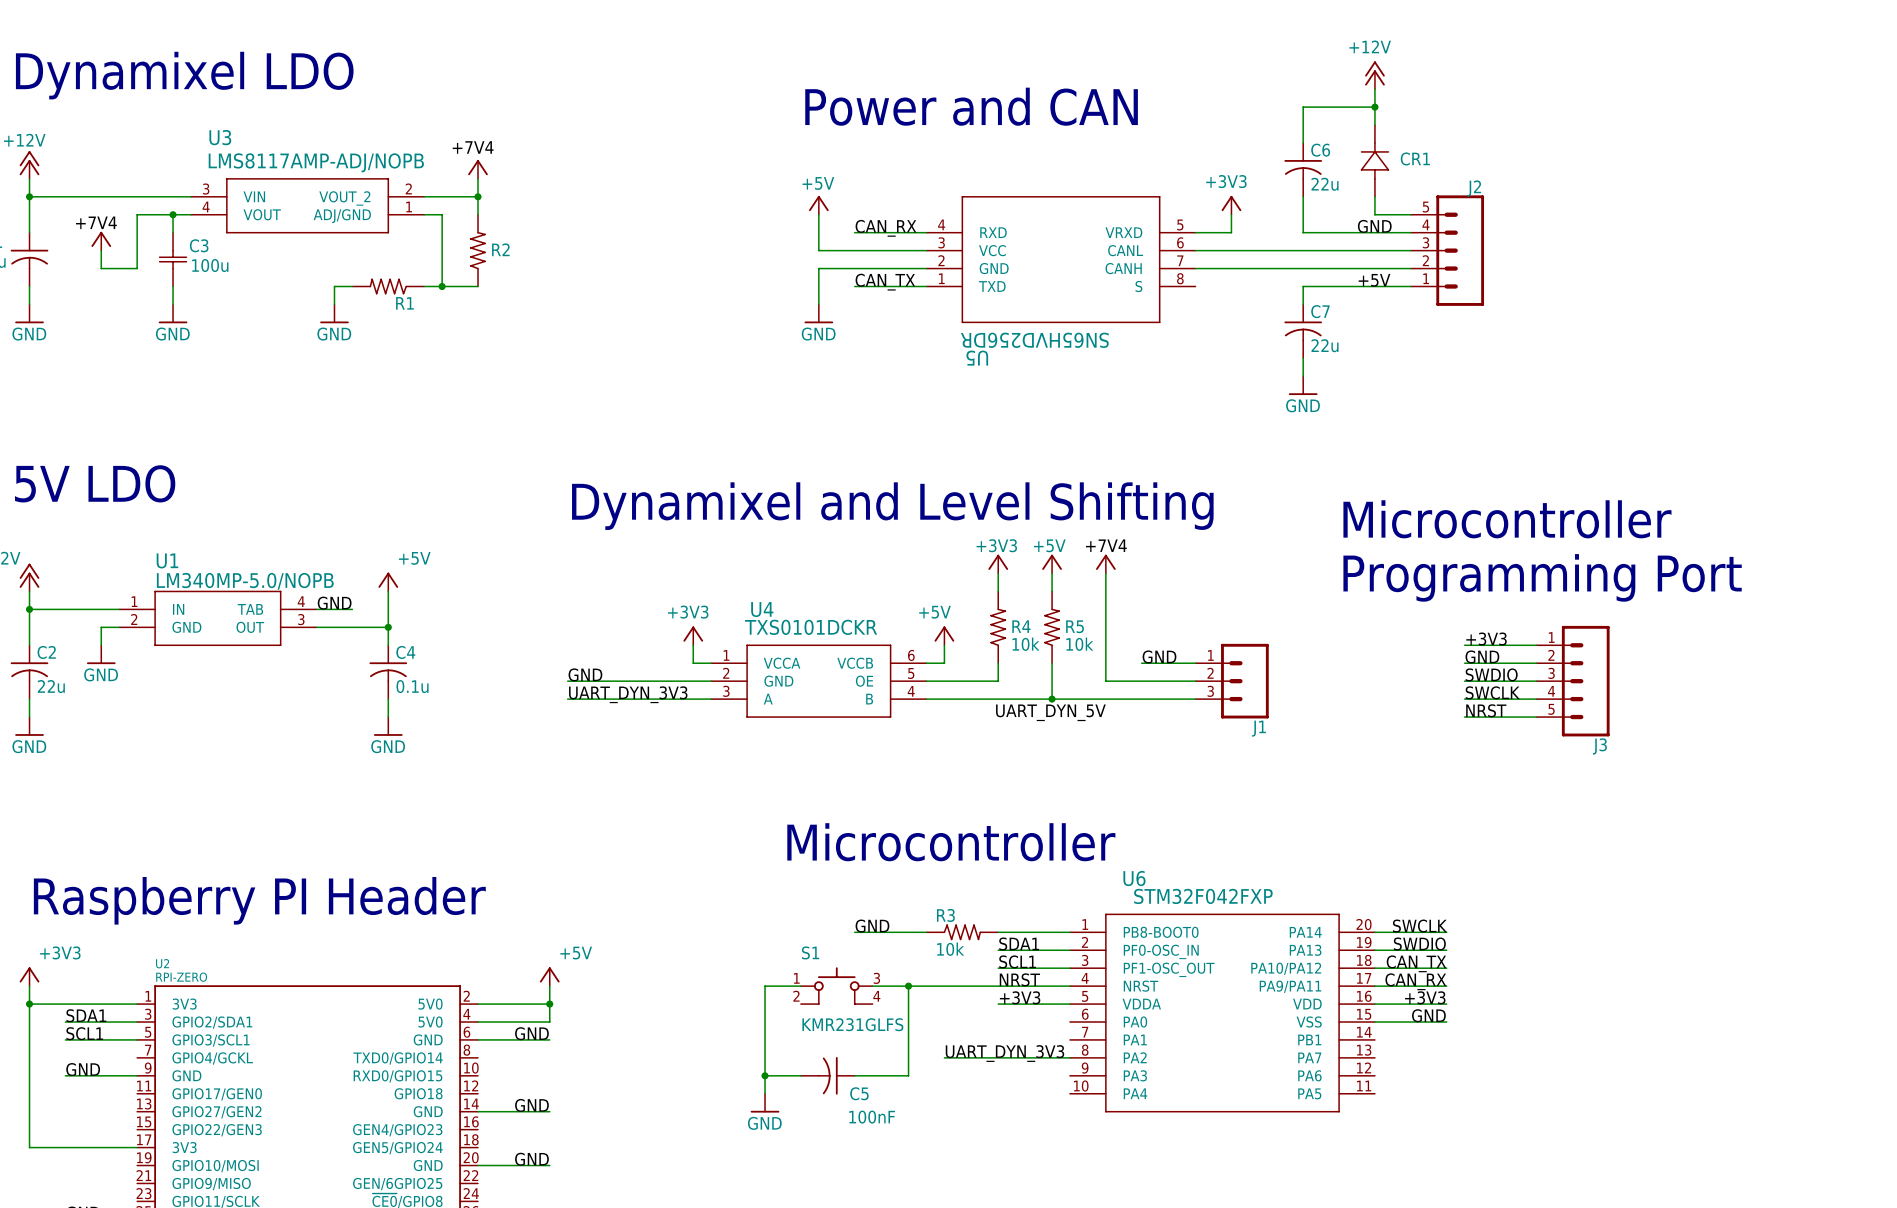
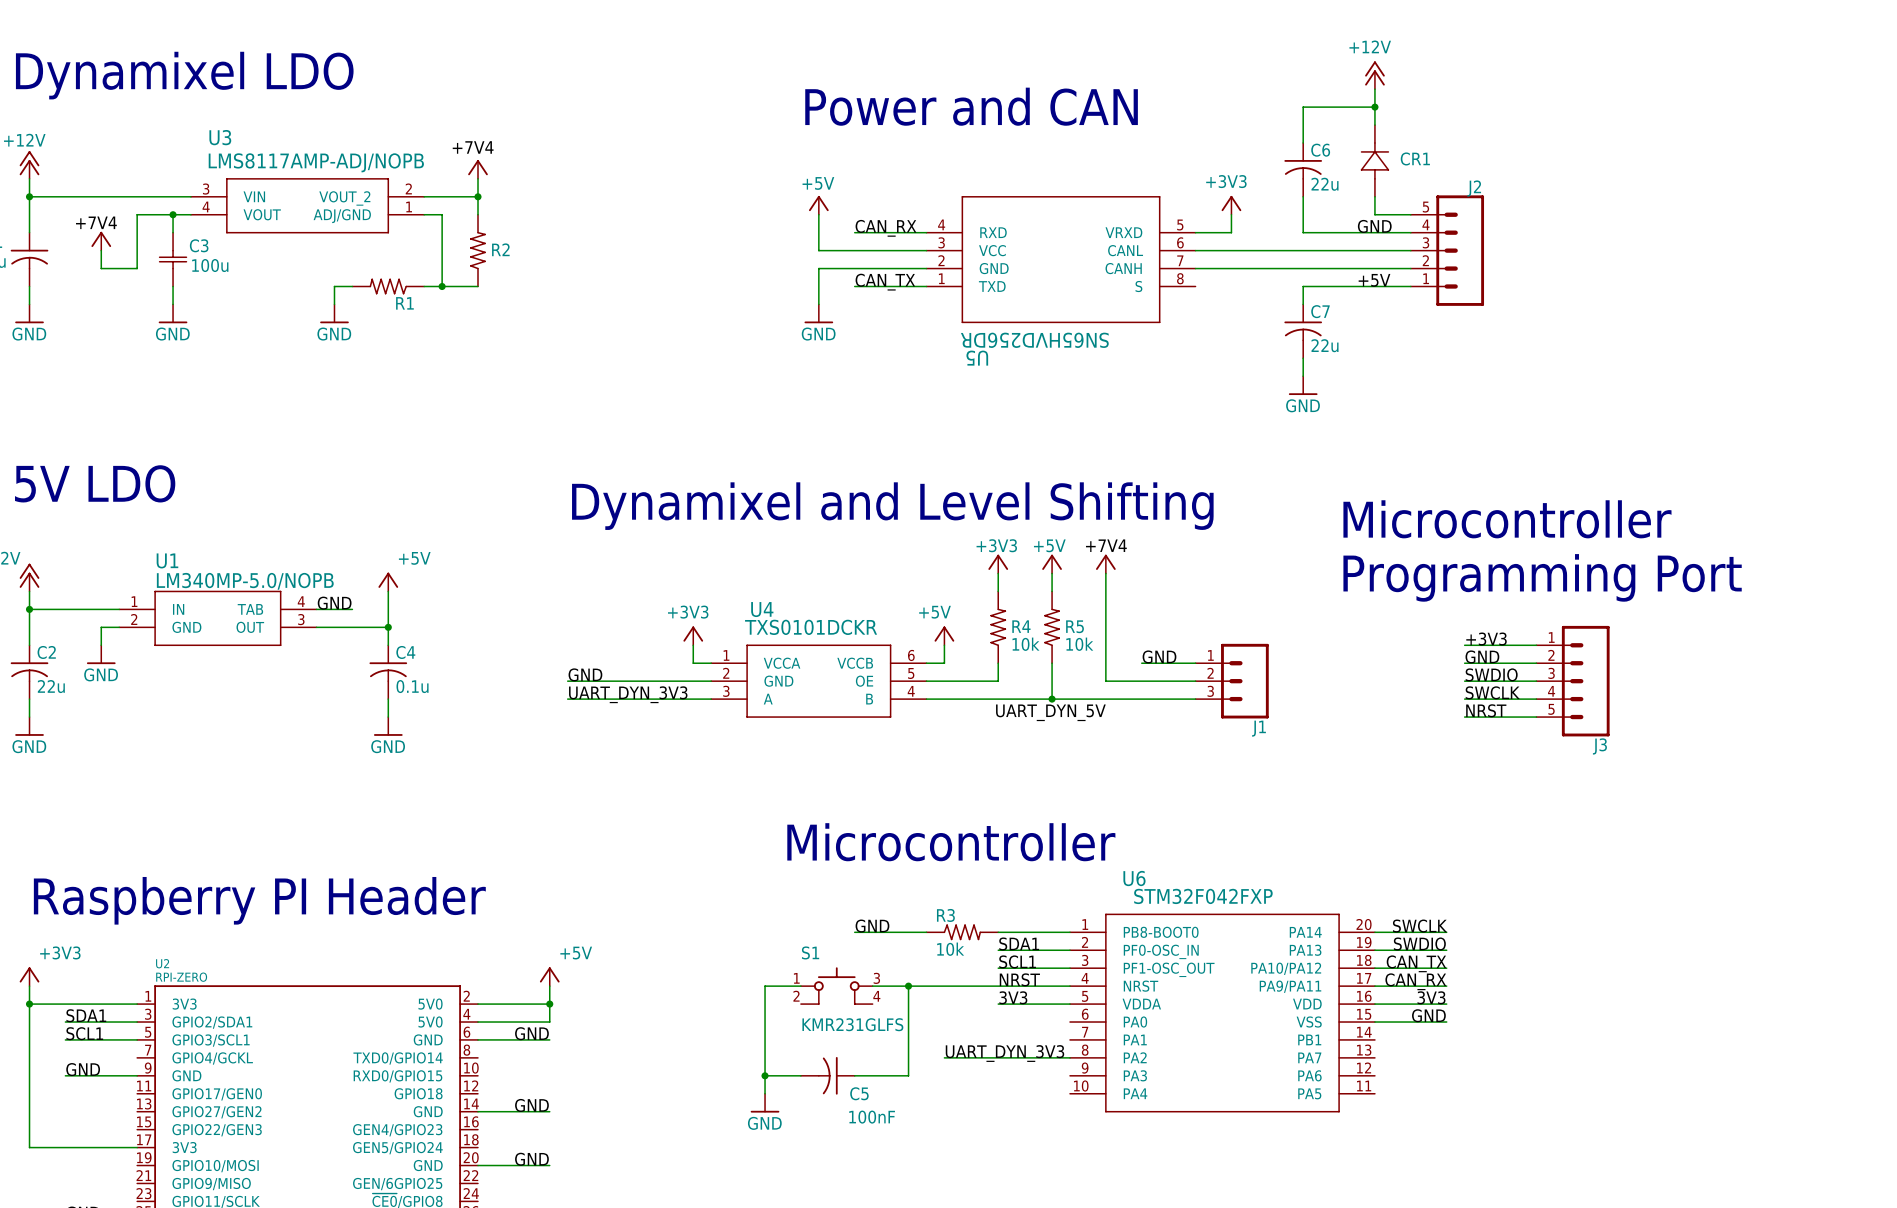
label: +3V3 (1020, 997) -> 3V3 (1013, 997)
label: +3V3 (1425, 997) -> 3V3 (1431, 997)

